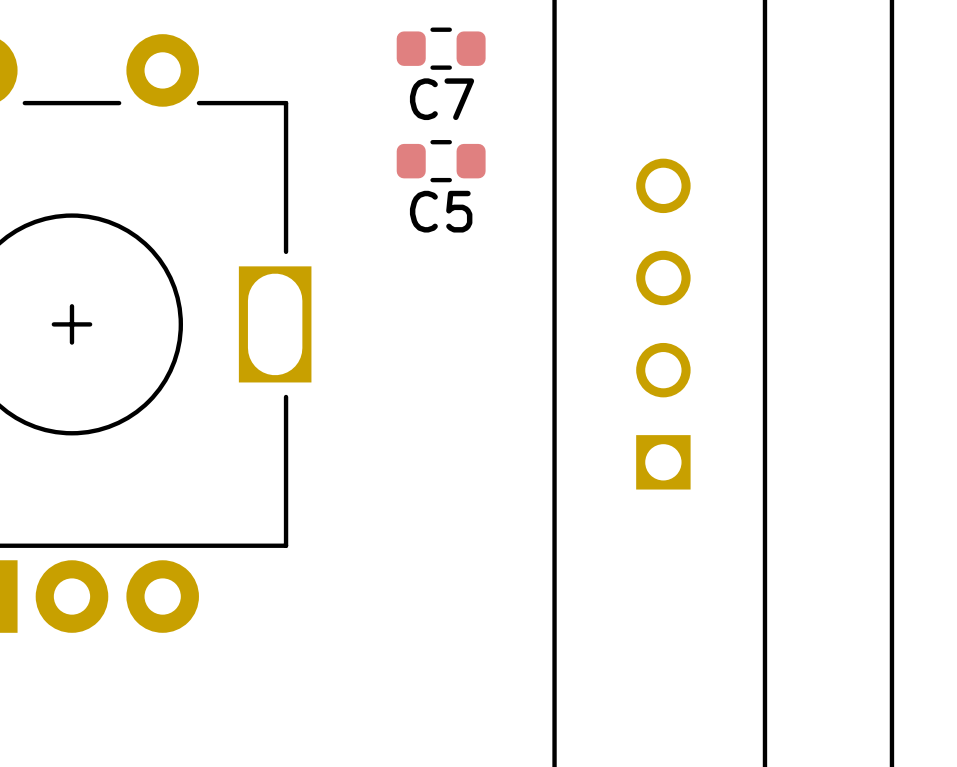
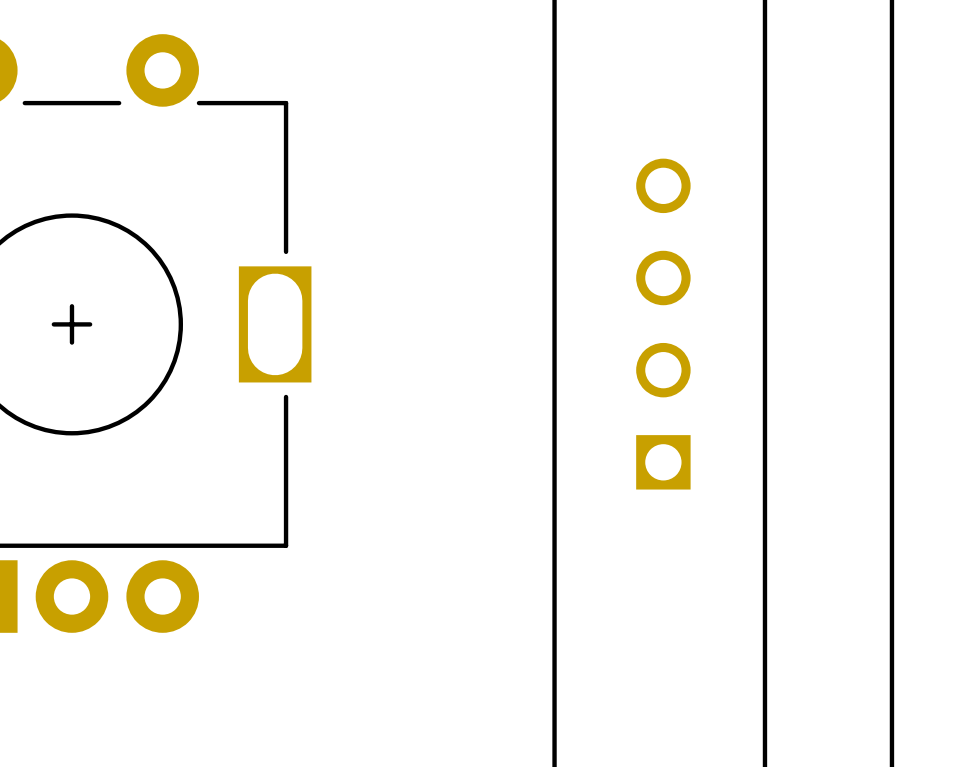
C7: (441, 48) -> none
C5: (441, 161) -> none

